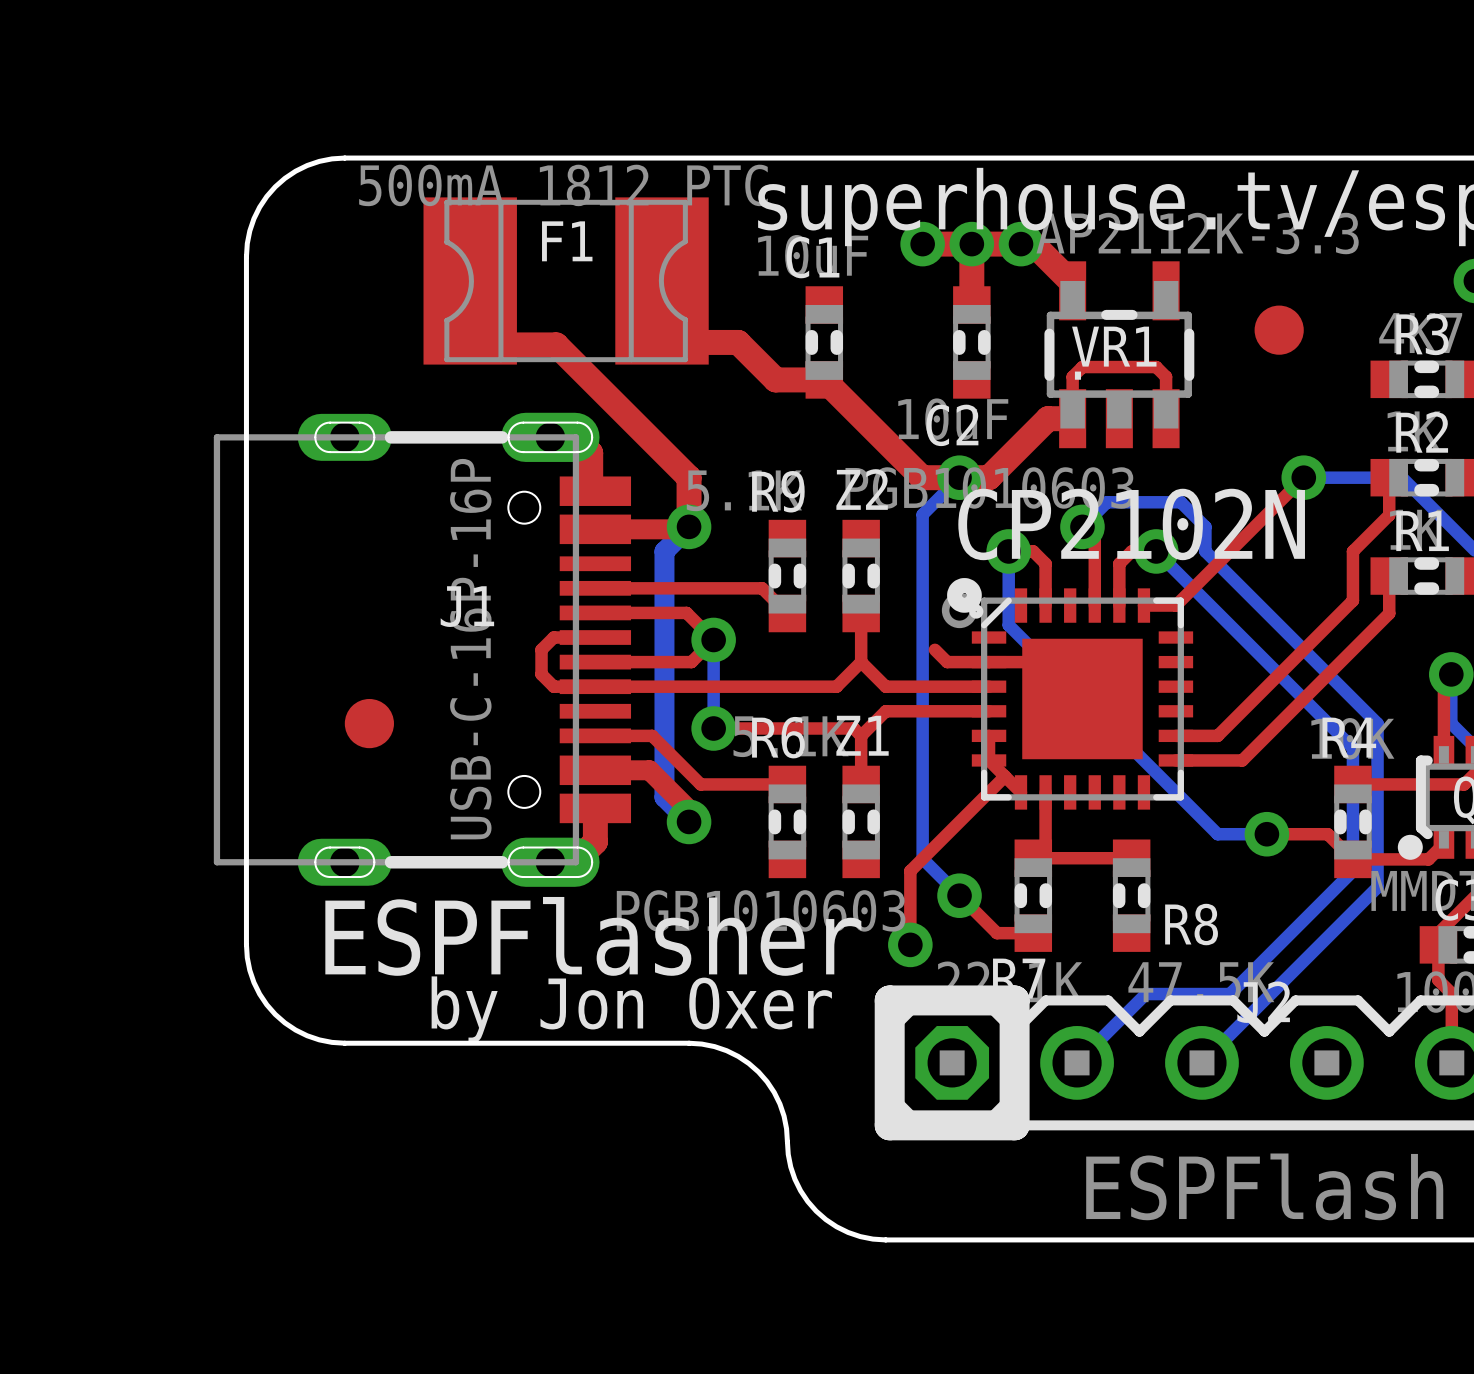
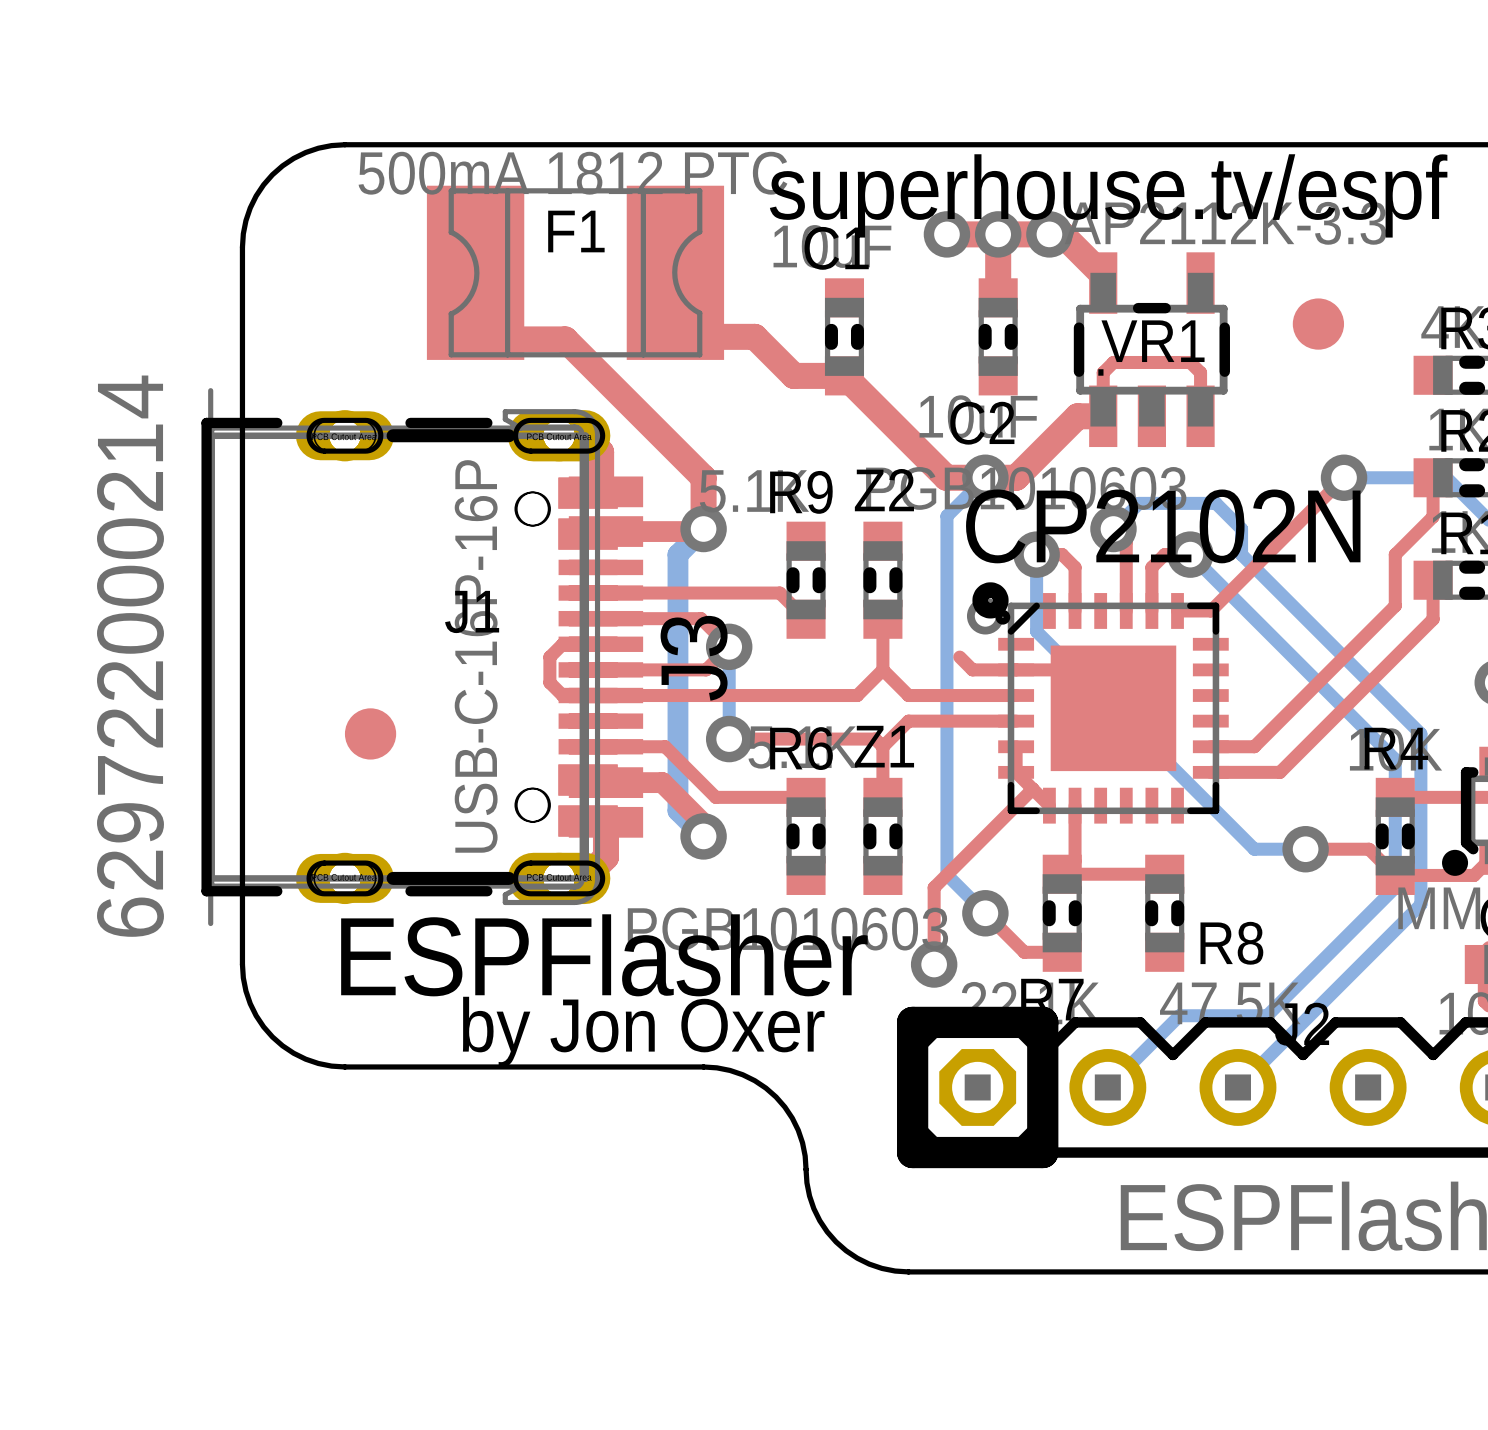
J3: none -> 629722000214 (409, 657)

